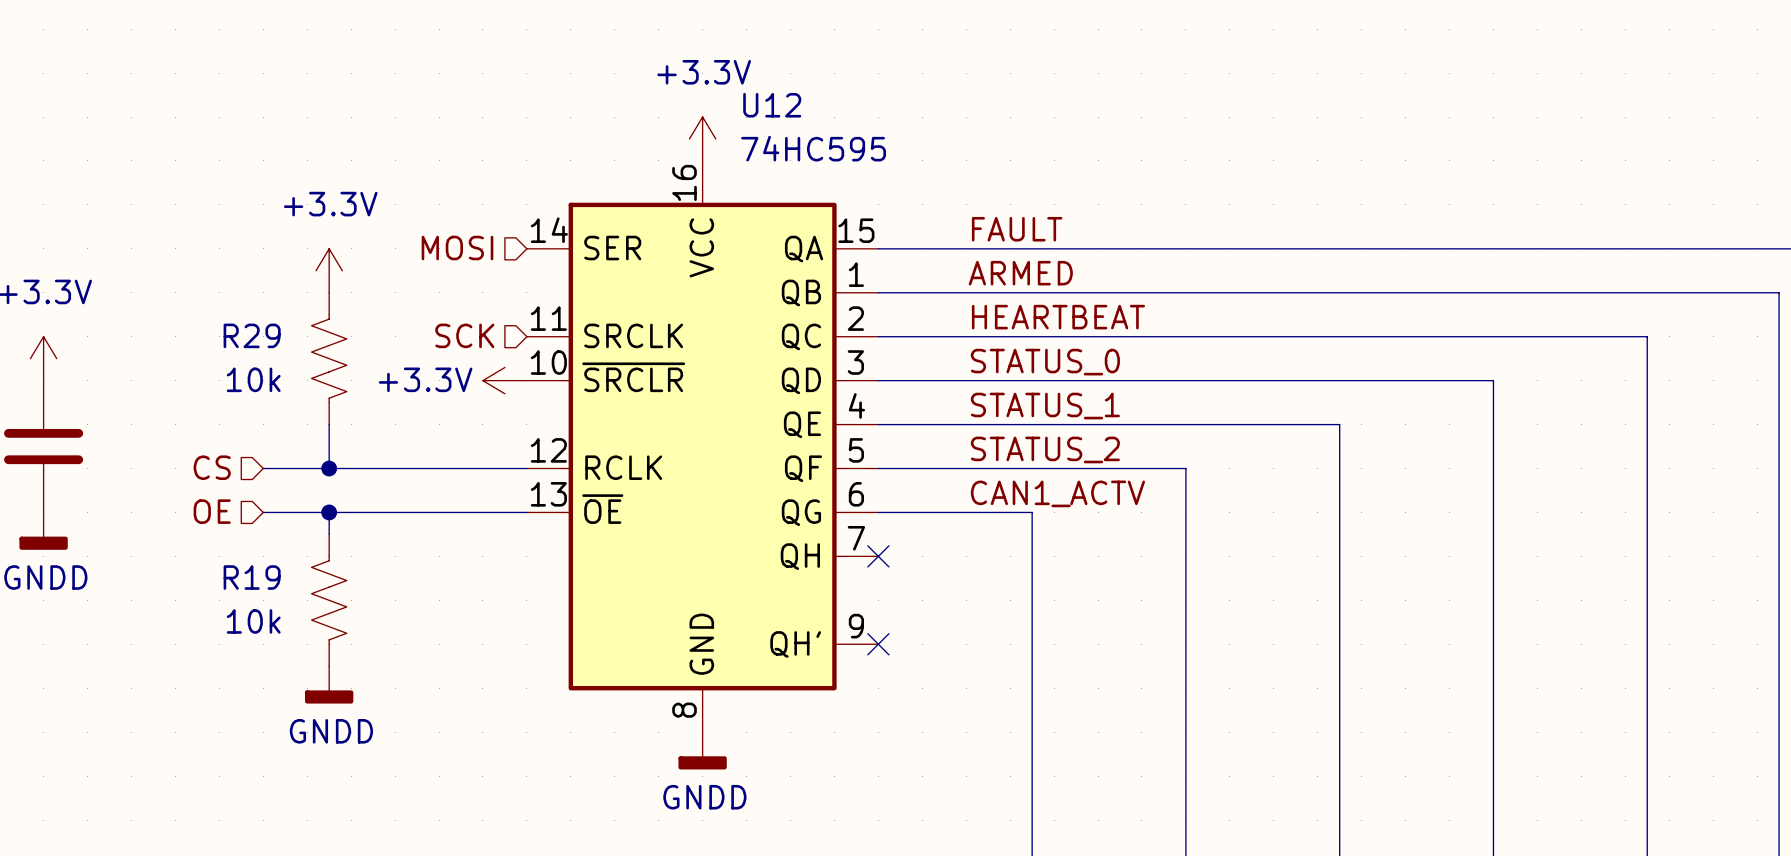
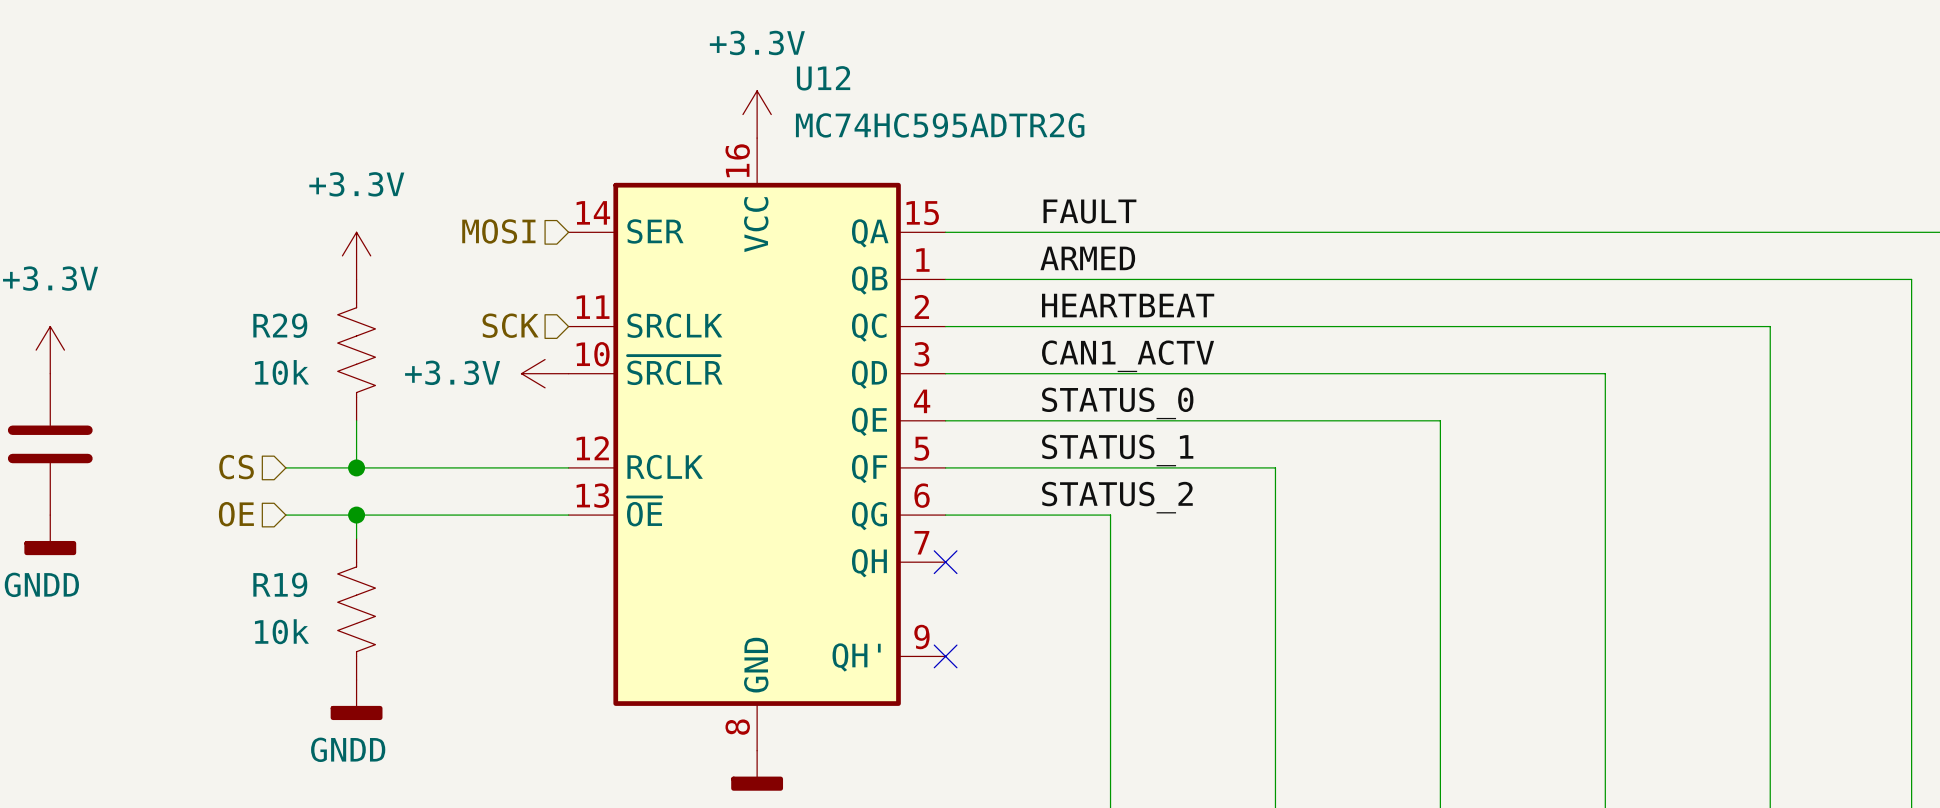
U12 value: 74HC595 (813, 148) -> MC74HC595ADTR2G (940, 125)
label: STATUS_0 (1045, 362) -> CAN1_ACTV (1128, 356)
label: STATUS_1 (1045, 406) -> STATUS_0 (1117, 403)
label: STATUS_2 (1045, 449) -> STATUS_1 (1117, 450)
label: CAN1_ACTV (1057, 493) -> STATUS_2 (1117, 497)

